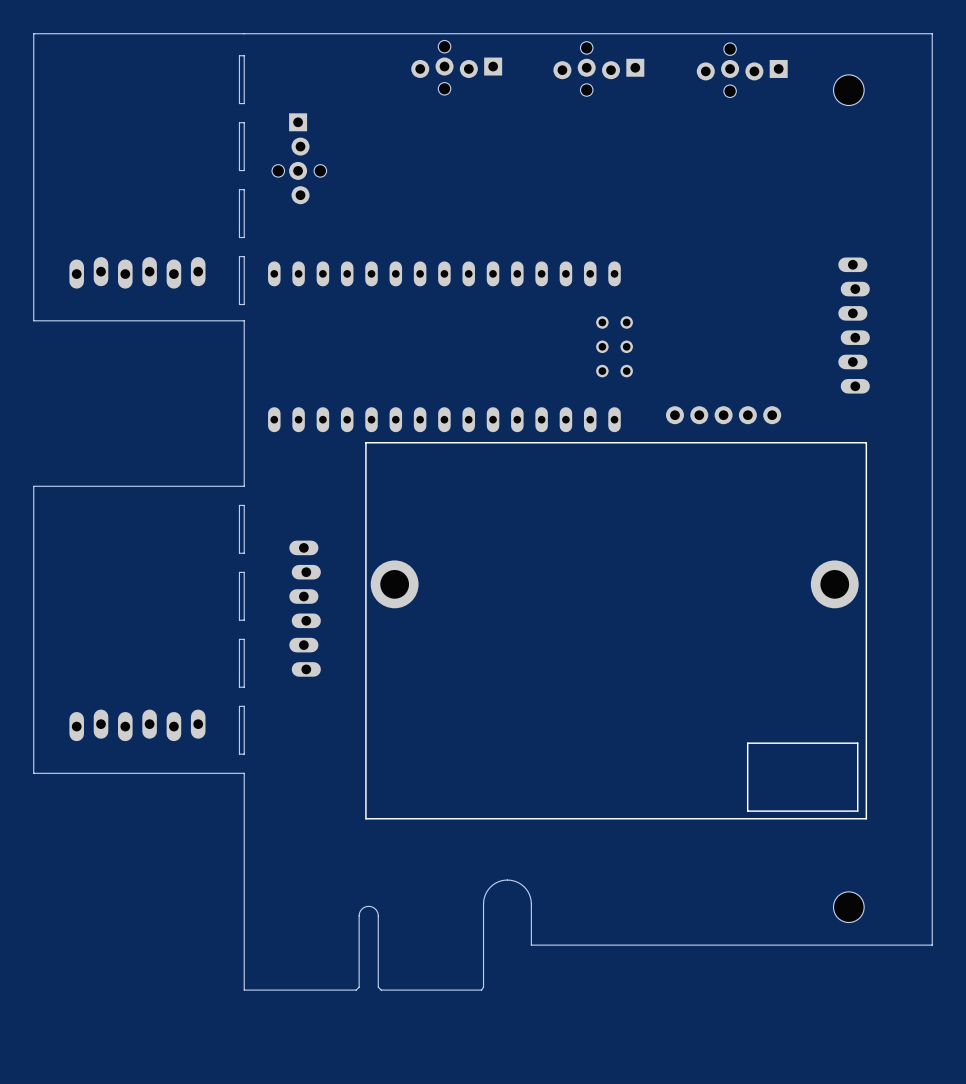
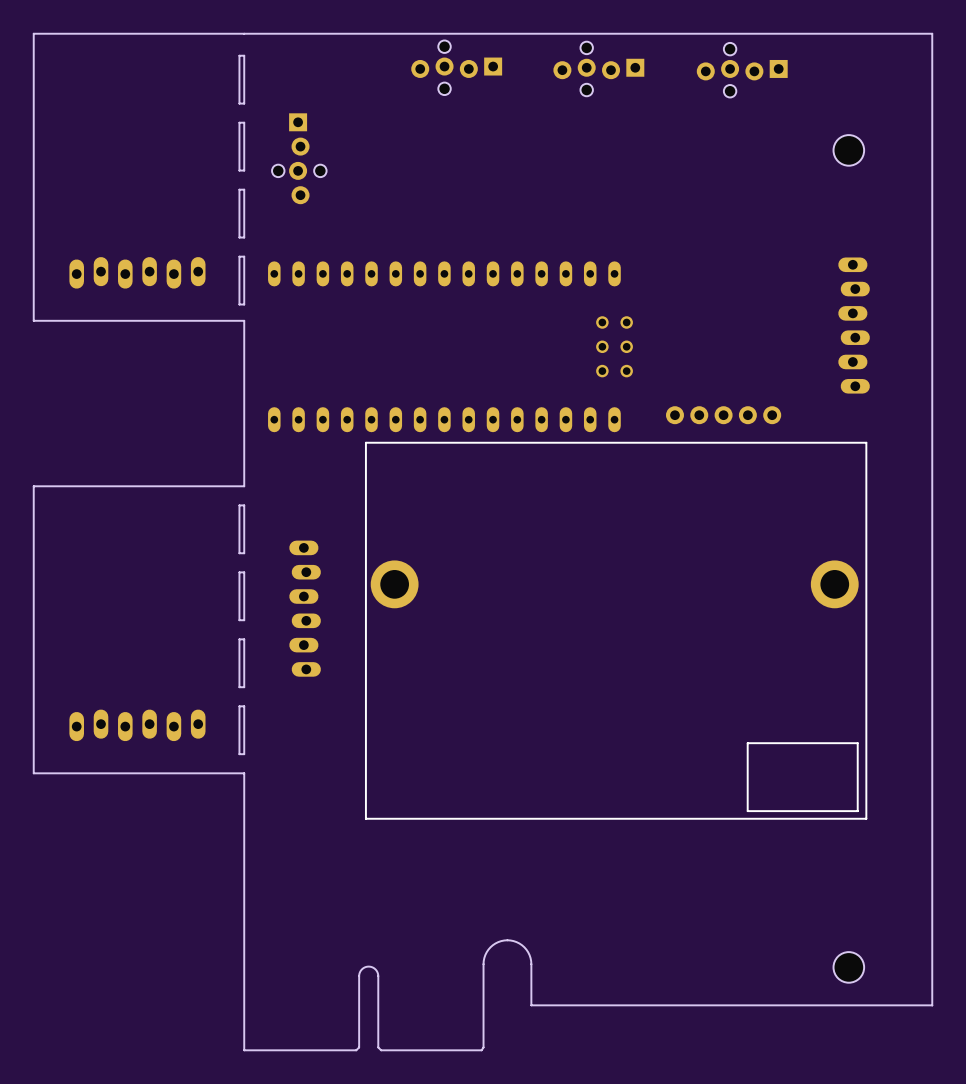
hole position: (848, 90) -> (848, 150)
hole position: (848, 907) -> (848, 967)
board edge: (932, 945) (531, 945) (529, 894) (519, 883) (507, 880) (492, 884) (484, 897) (483, 964) -> (932, 945) (932, 1005) (531, 1005) (531, 961) (528, 952) (522, 945) (507, 940) (495, 943) (486, 952) (483, 964)
board edge: (378, 976) (378, 914) (374, 908) (368, 906) (362, 908) (359, 914) (359, 976) -> (378, 976) (375, 969) (368, 966) (361, 969) (359, 976)
board edge: (359, 987) (356, 990) (244, 990) -> (359, 987) (359, 1047) (356, 1050) (244, 1050) (244, 990)
board edge: (483, 987) (481, 990) (381, 990) (378, 987) -> (483, 987) (483, 1047) (481, 1050) (381, 1050) (378, 1047) (378, 987)

